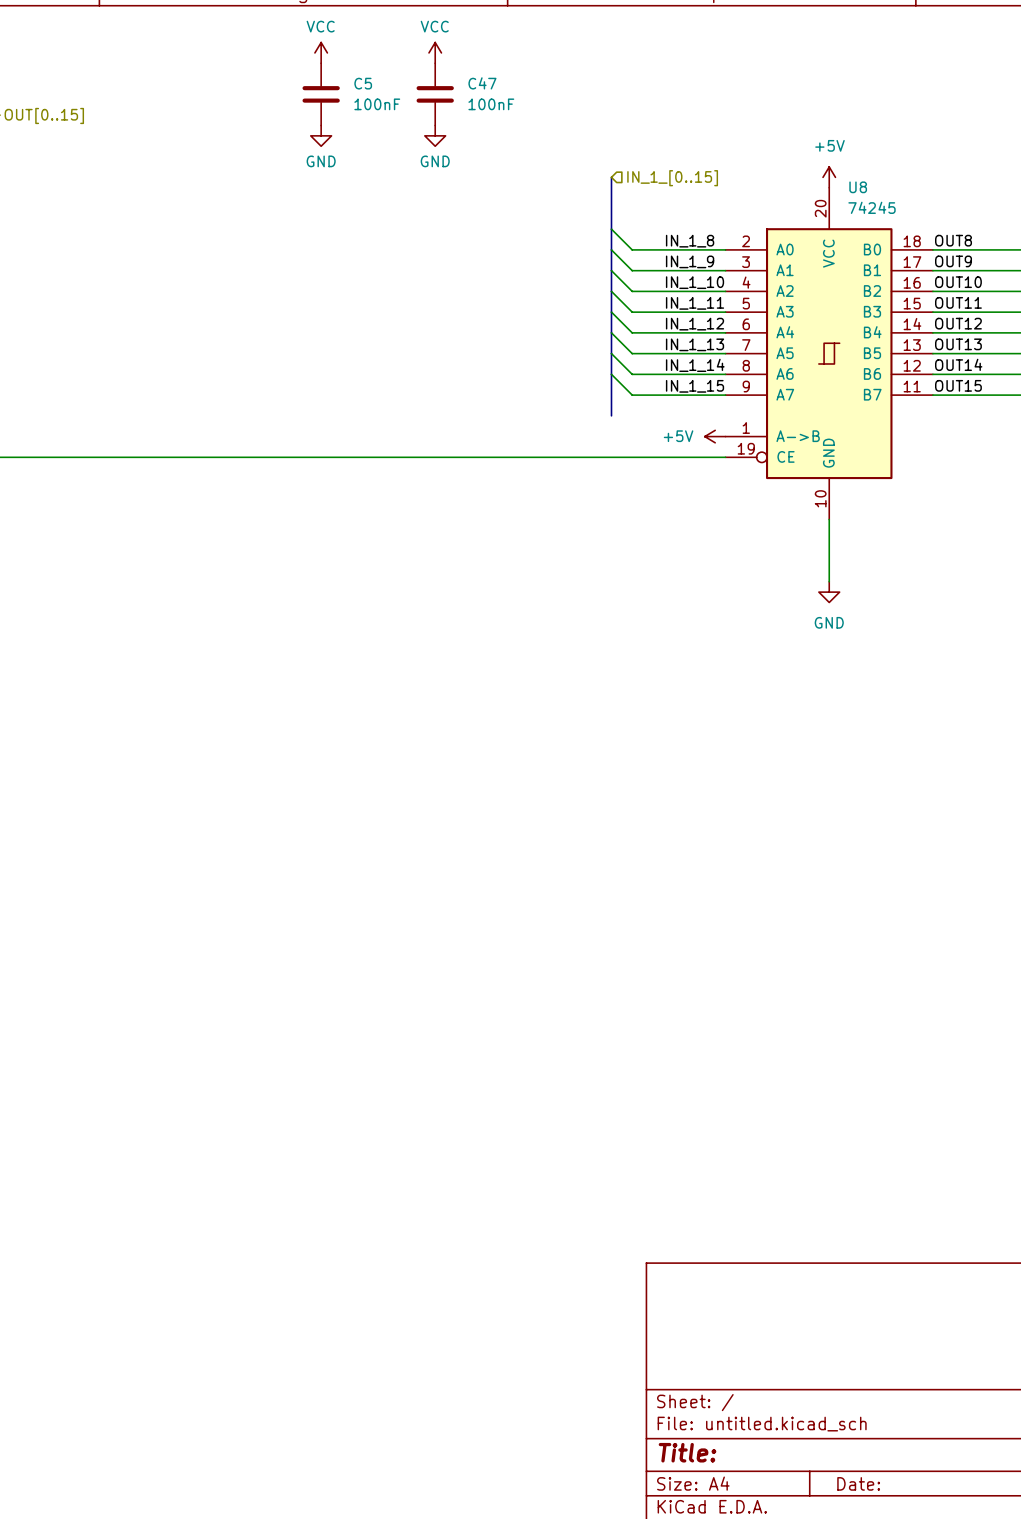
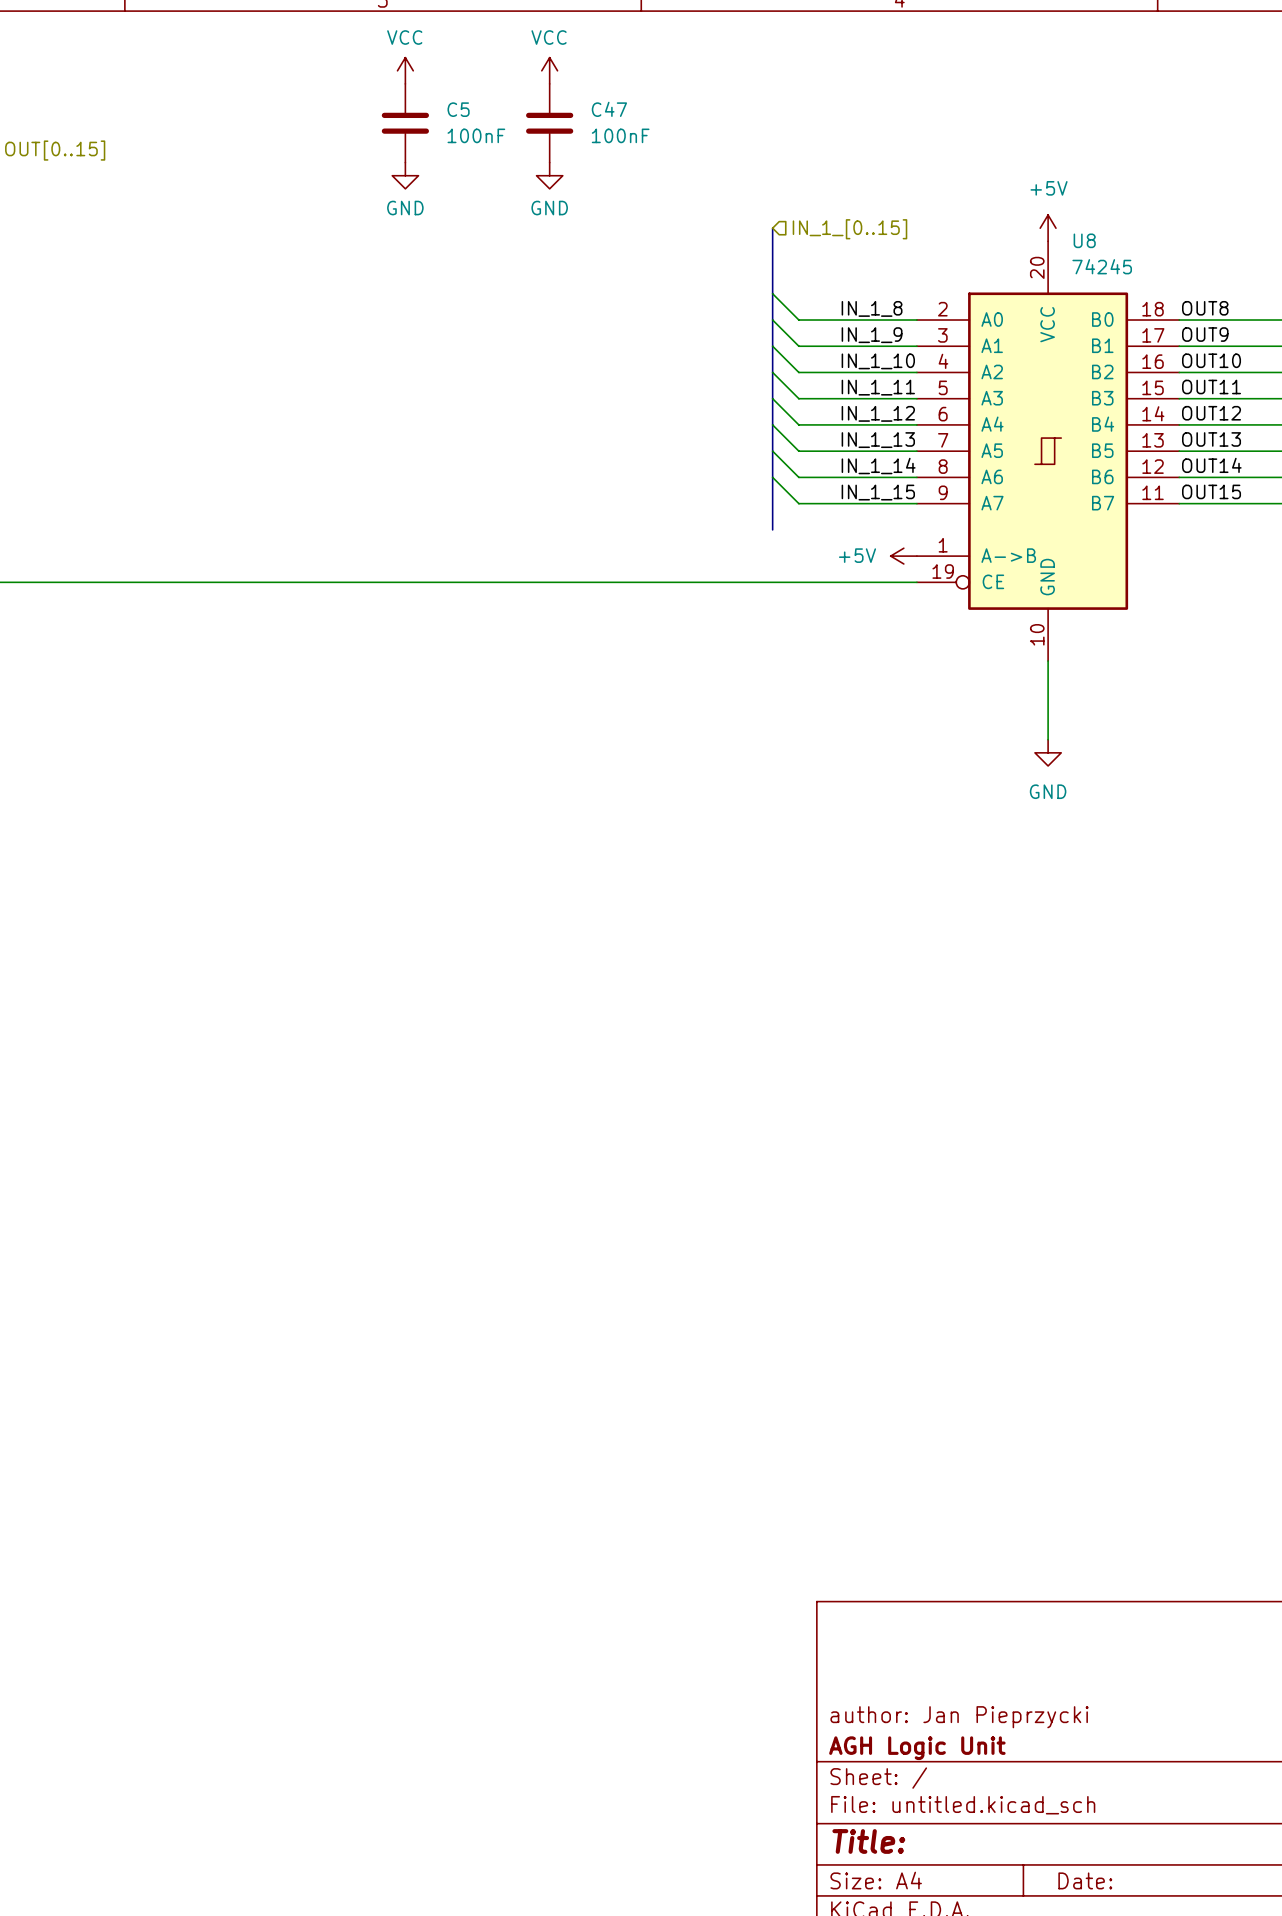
title block: none -> author: Jan Pieprzycki (959, 1717)
title block: none -> AGH Logic Unit (917, 1748)

